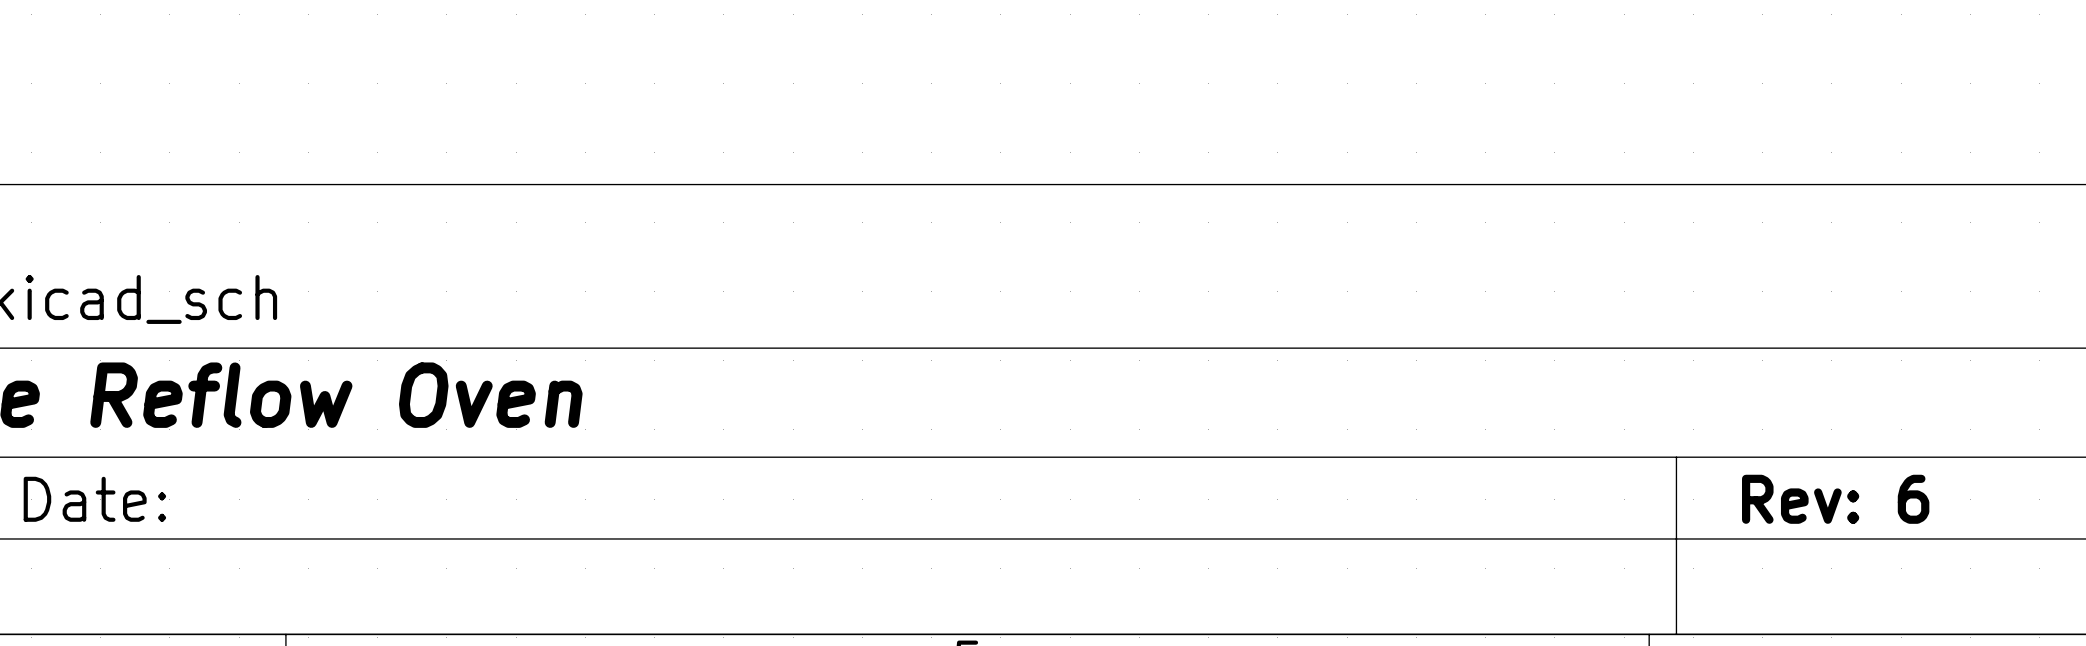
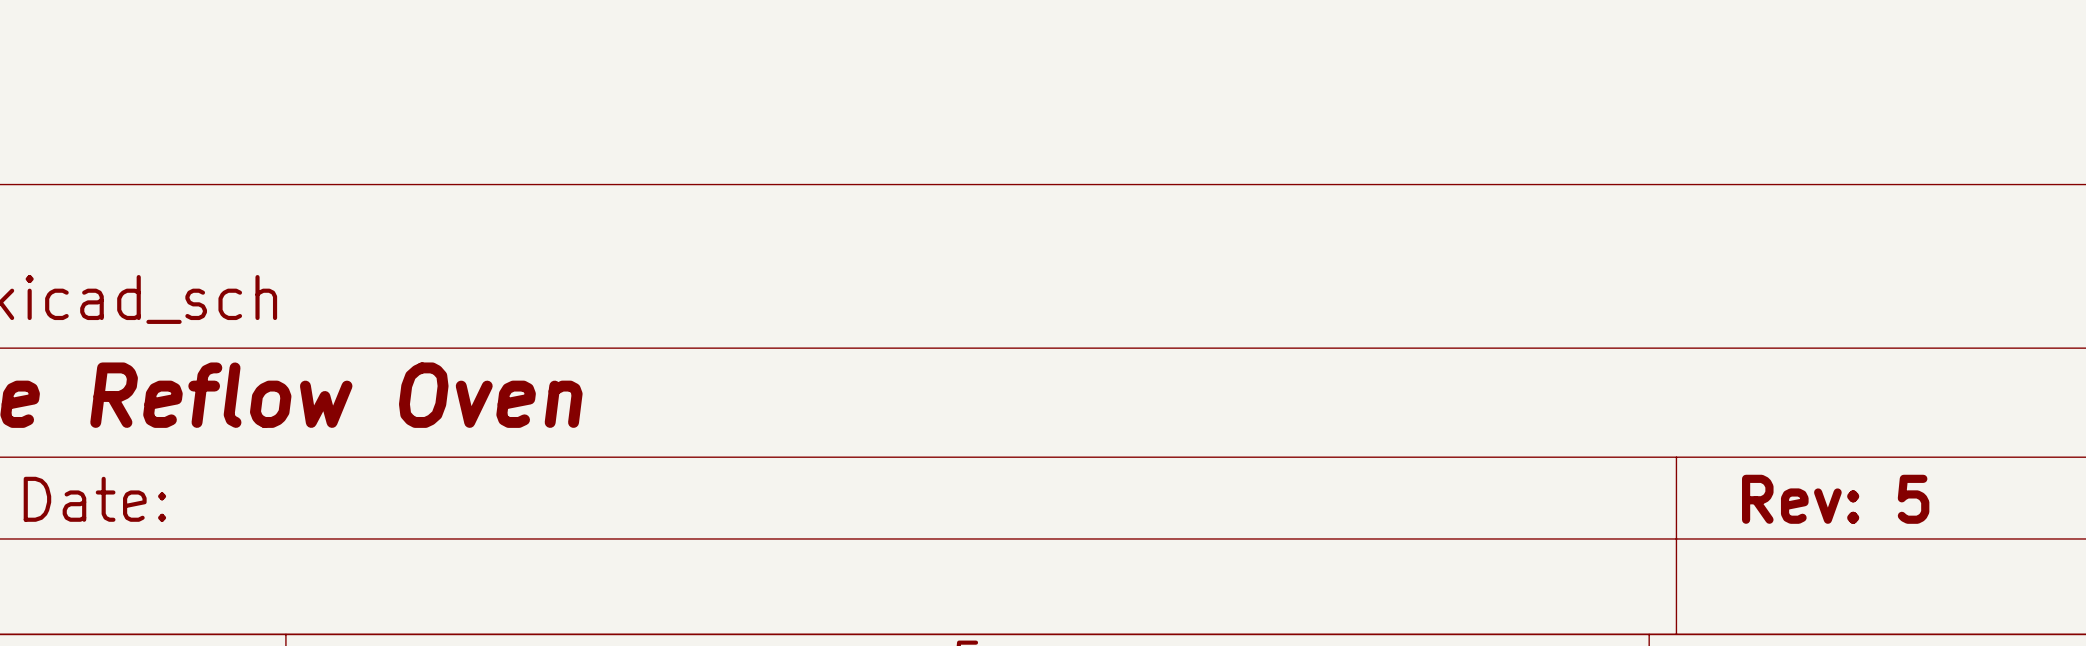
title block: Rev: 6 (1835, 499) -> Rev: 5 (1835, 499)

